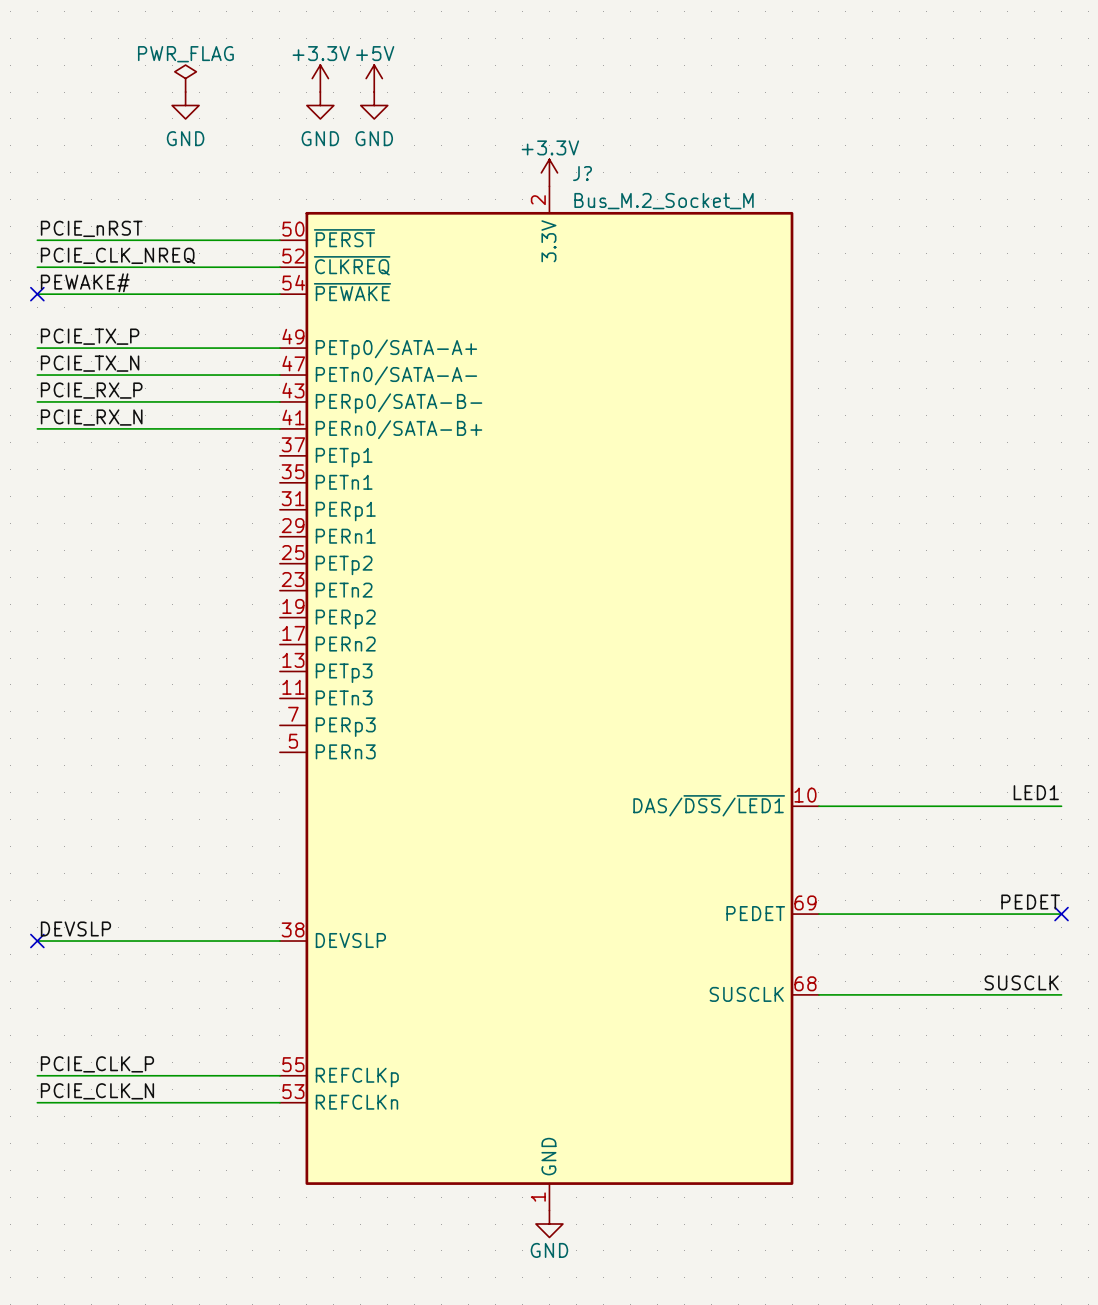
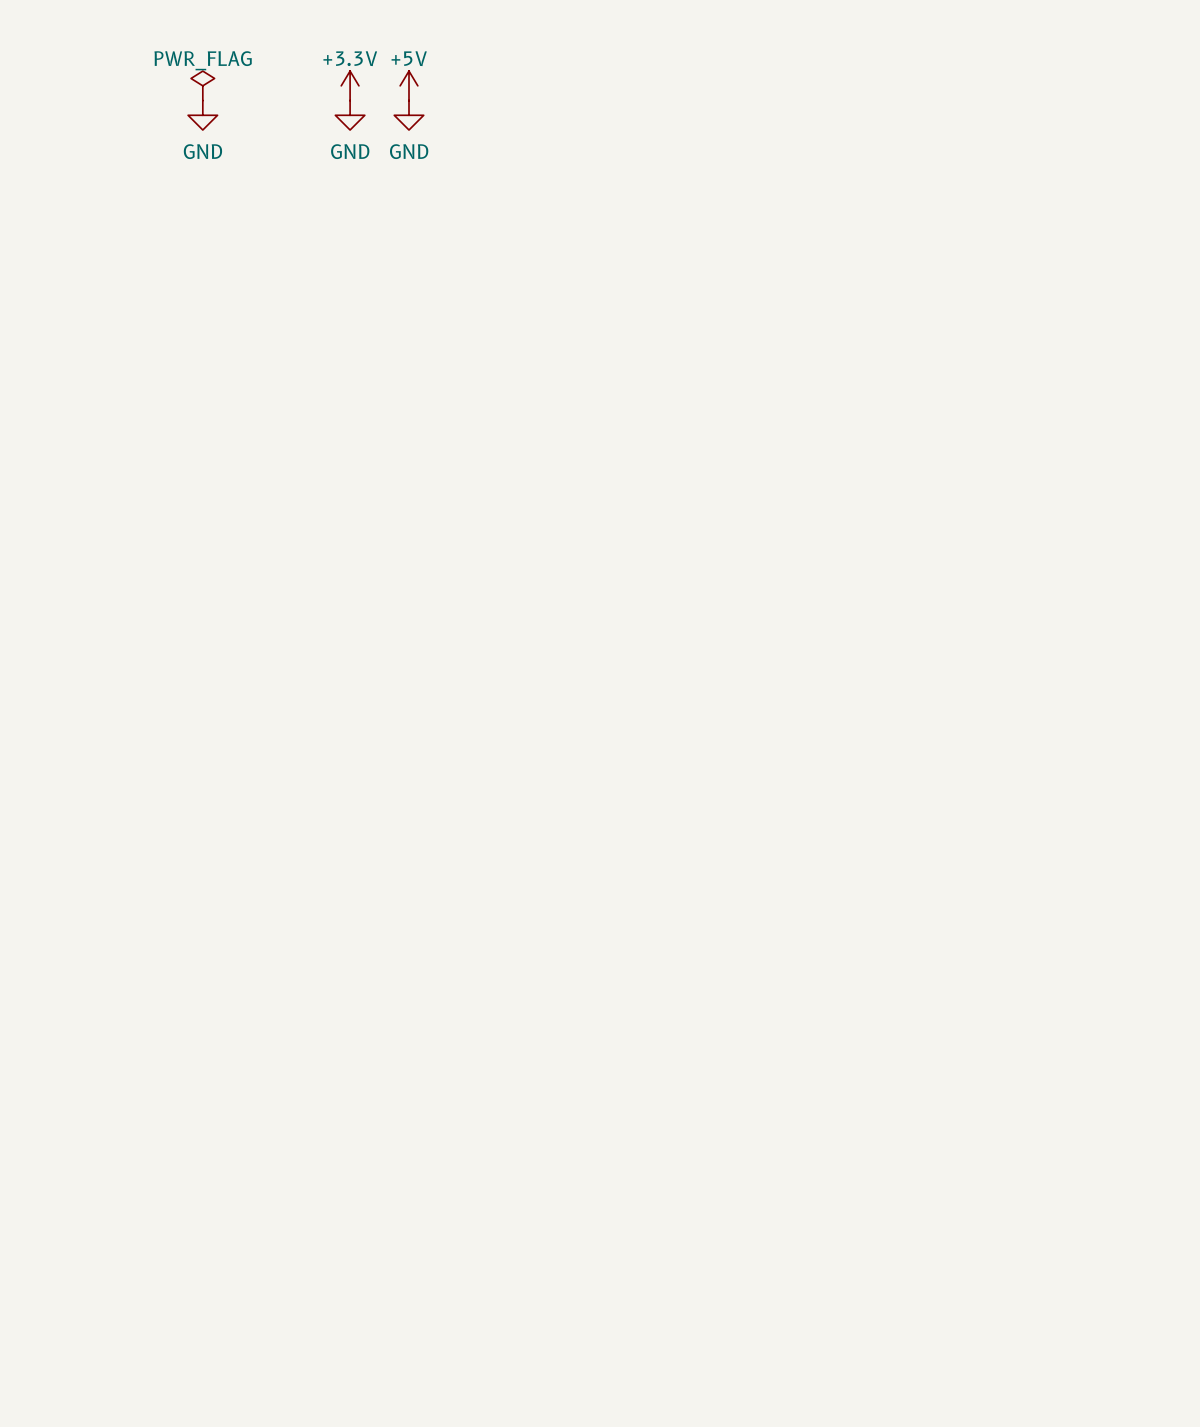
power symbol: +3.3V (549, 172) -> none
label: PCIE_nRST (91, 228) -> none
wire: (37, 240) (279, 240) -> none
label: PCIE_CLK_NREQ (117, 255) -> none
wire: (37, 267) (279, 267) -> none
label: PEWAKE# (85, 282) -> none
wire: (37, 294) (279, 294) -> none
no-connect mark: (37, 294) -> none
label: PCIE_TX_P (90, 336) -> none
wire: (37, 348) (279, 348) -> none
label: PCIE_TX_N (90, 363) -> none
wire: (37, 375) (279, 375) -> none
label: PCIE_RX_P (91, 390) -> none
wire: (37, 401) (279, 401) -> none
label: PCIE_RX_N (91, 417) -> none
wire: (37, 428) (279, 428) -> none
J?: Bus_M.2_Socket_M (549, 698) -> none
label: LED1 (1036, 792) -> none
wire: (818, 806) (1061, 806) -> none
label: PEDET (1030, 902) -> none
wire: (818, 914) (1061, 914) -> none
no-connect mark: (1061, 914) -> none
label: DEVSLP (75, 928) -> none
wire: (37, 941) (279, 941) -> none
no-connect mark: (37, 941) -> none
label: SUSCLK (1021, 982) -> none
wire: (818, 994) (1061, 994) -> none
label: PCIE_CLK_P (97, 1064) -> none
wire: (37, 1075) (279, 1075) -> none
label: PCIE_CLK_N (97, 1091) -> none
wire: (37, 1102) (279, 1102) -> none
power symbol: GND (549, 1224) -> none

